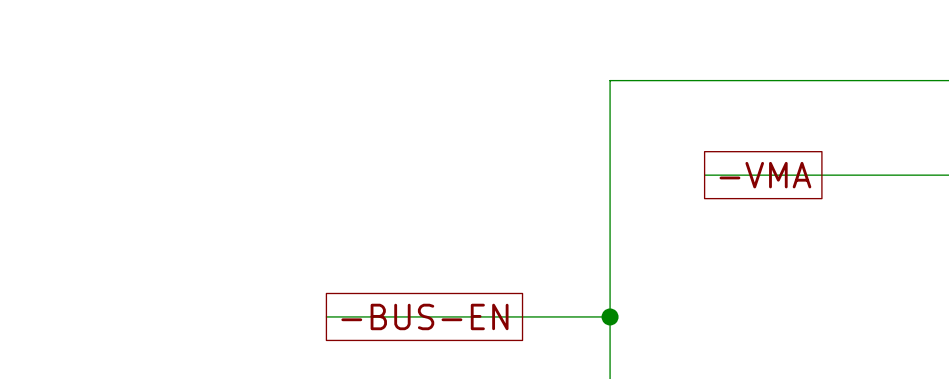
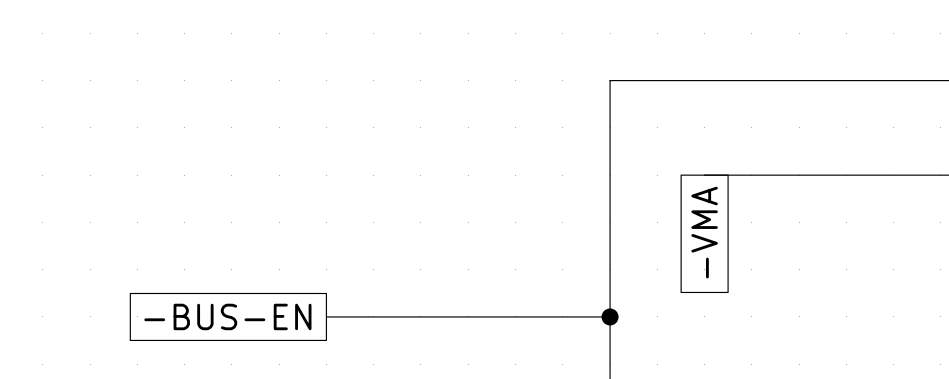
global label rotation: 0° (765, 175) -> 90° clockwise (704, 232)
global label rotation: 0° (424, 316) -> 180° (227, 316)

